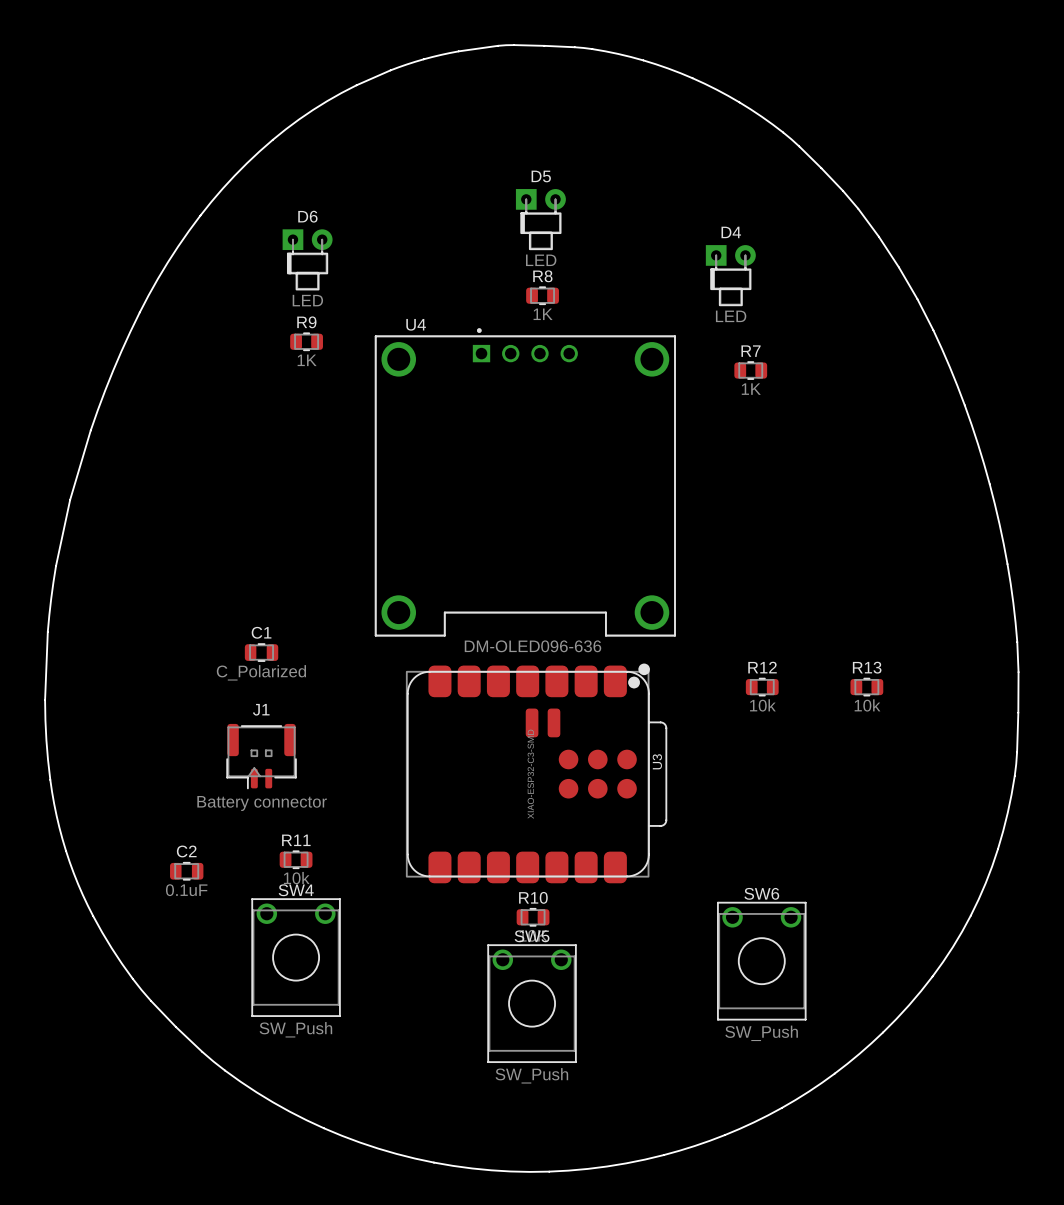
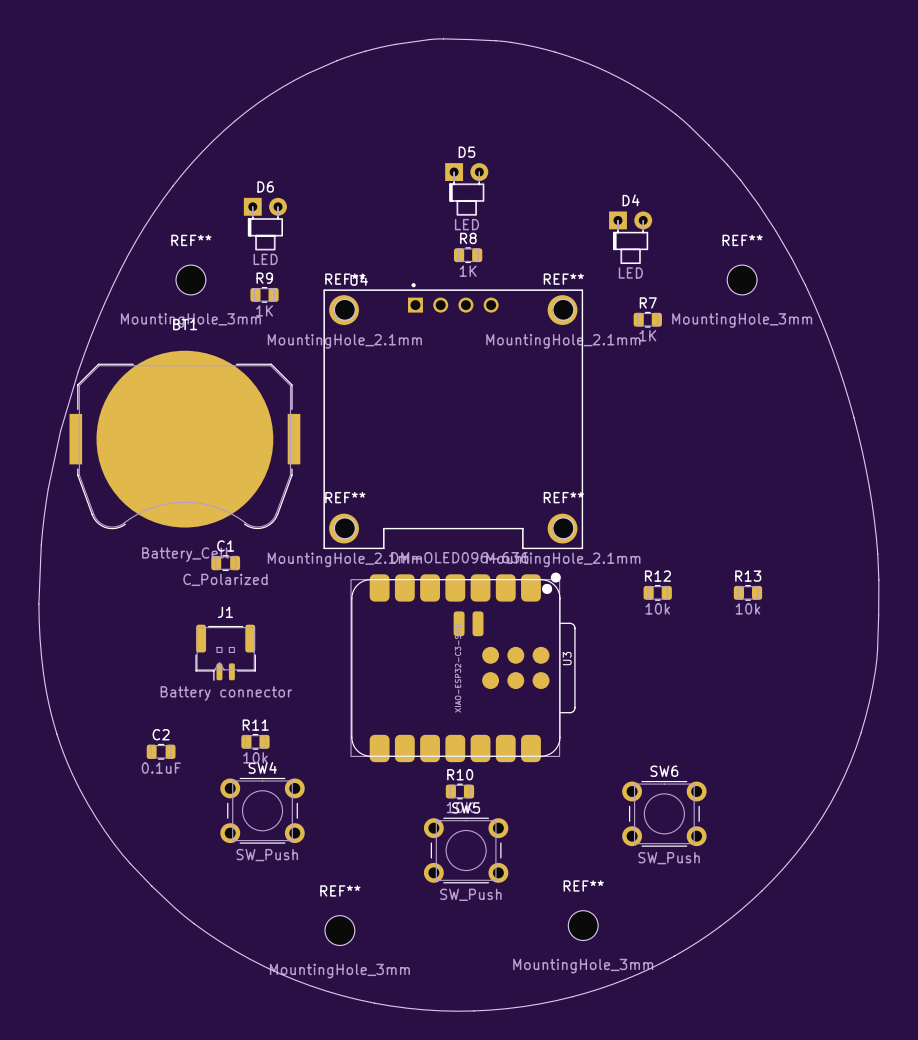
REF**: none -> MountingHole_3mm (190, 280)
REF**: none -> MountingHole_3mm (742, 280)
REF**: none -> MountingHole_2.1mm (344, 309)
REF**: none -> MountingHole_2.1mm (563, 309)
BT1: none -> Battery_Cell (184, 439)
REF**: none -> MountingHole_2.1mm (344, 528)
REF**: none -> MountingHole_2.1mm (563, 528)
SW4 footprint: [251, 898, 341, 1017] -> [220, 777, 305, 844]
SW6 footprint: [717, 901, 807, 1021] -> [622, 780, 707, 847]
SW5 footprint: [487, 944, 577, 1063] -> [423, 817, 509, 884]
REF**: none -> MountingHole_3mm (583, 925)
REF**: none -> MountingHole_3mm (339, 930)

